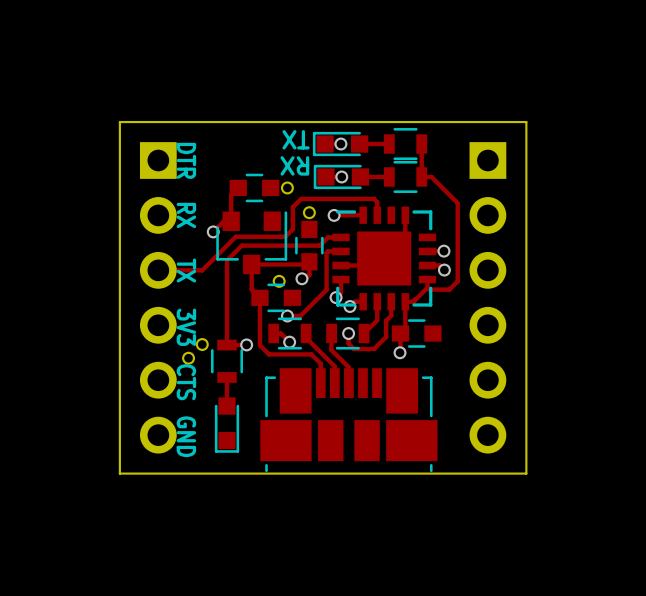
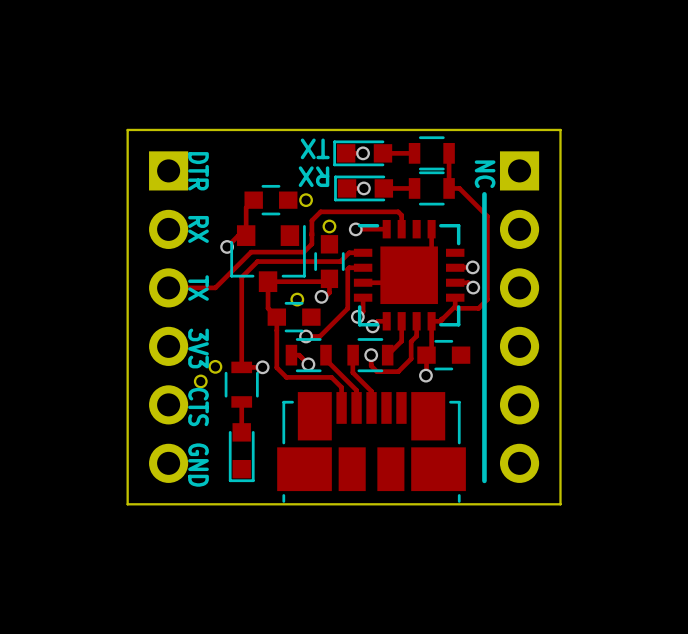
text: none -> NC (485, 174)
line: none -> (484, 194) (484, 480)

